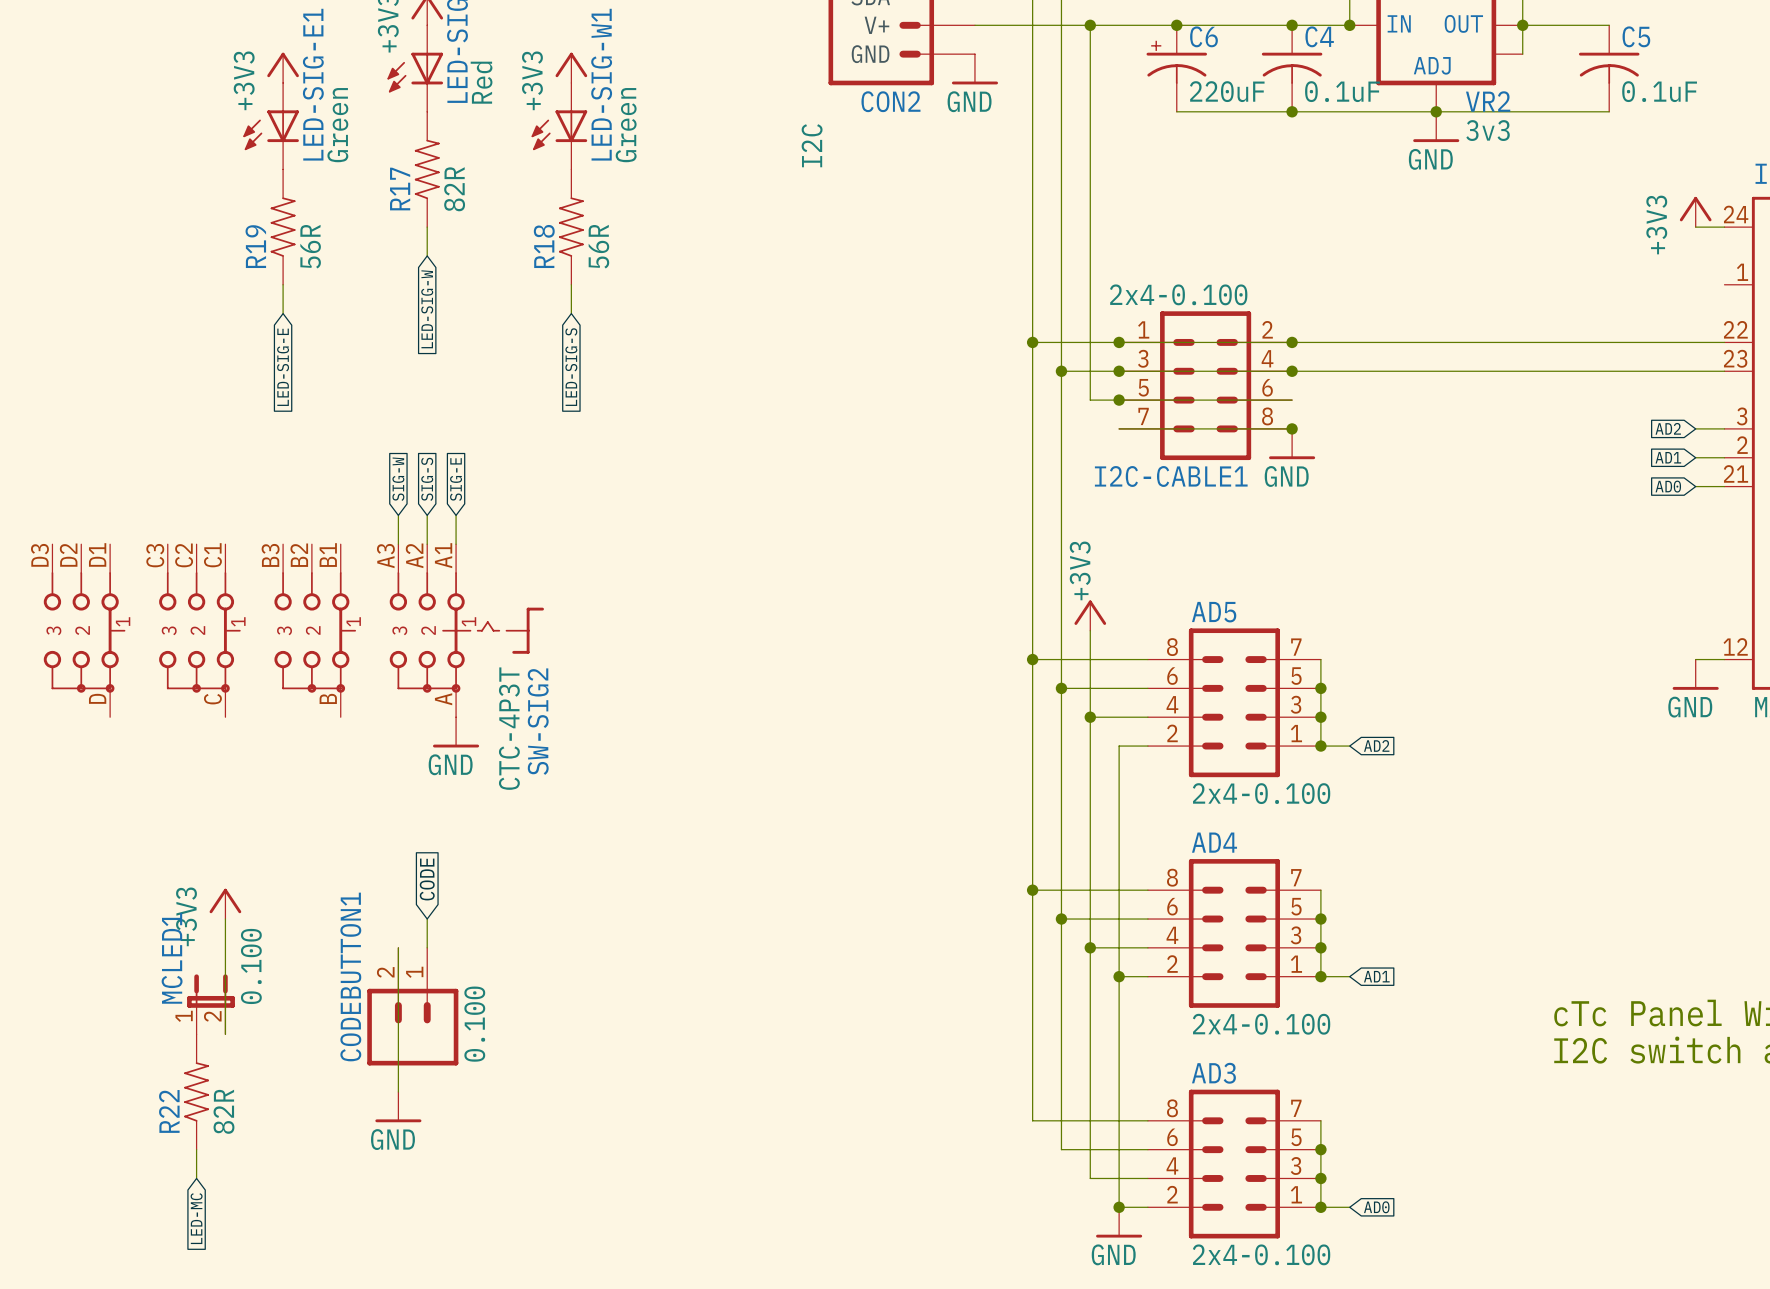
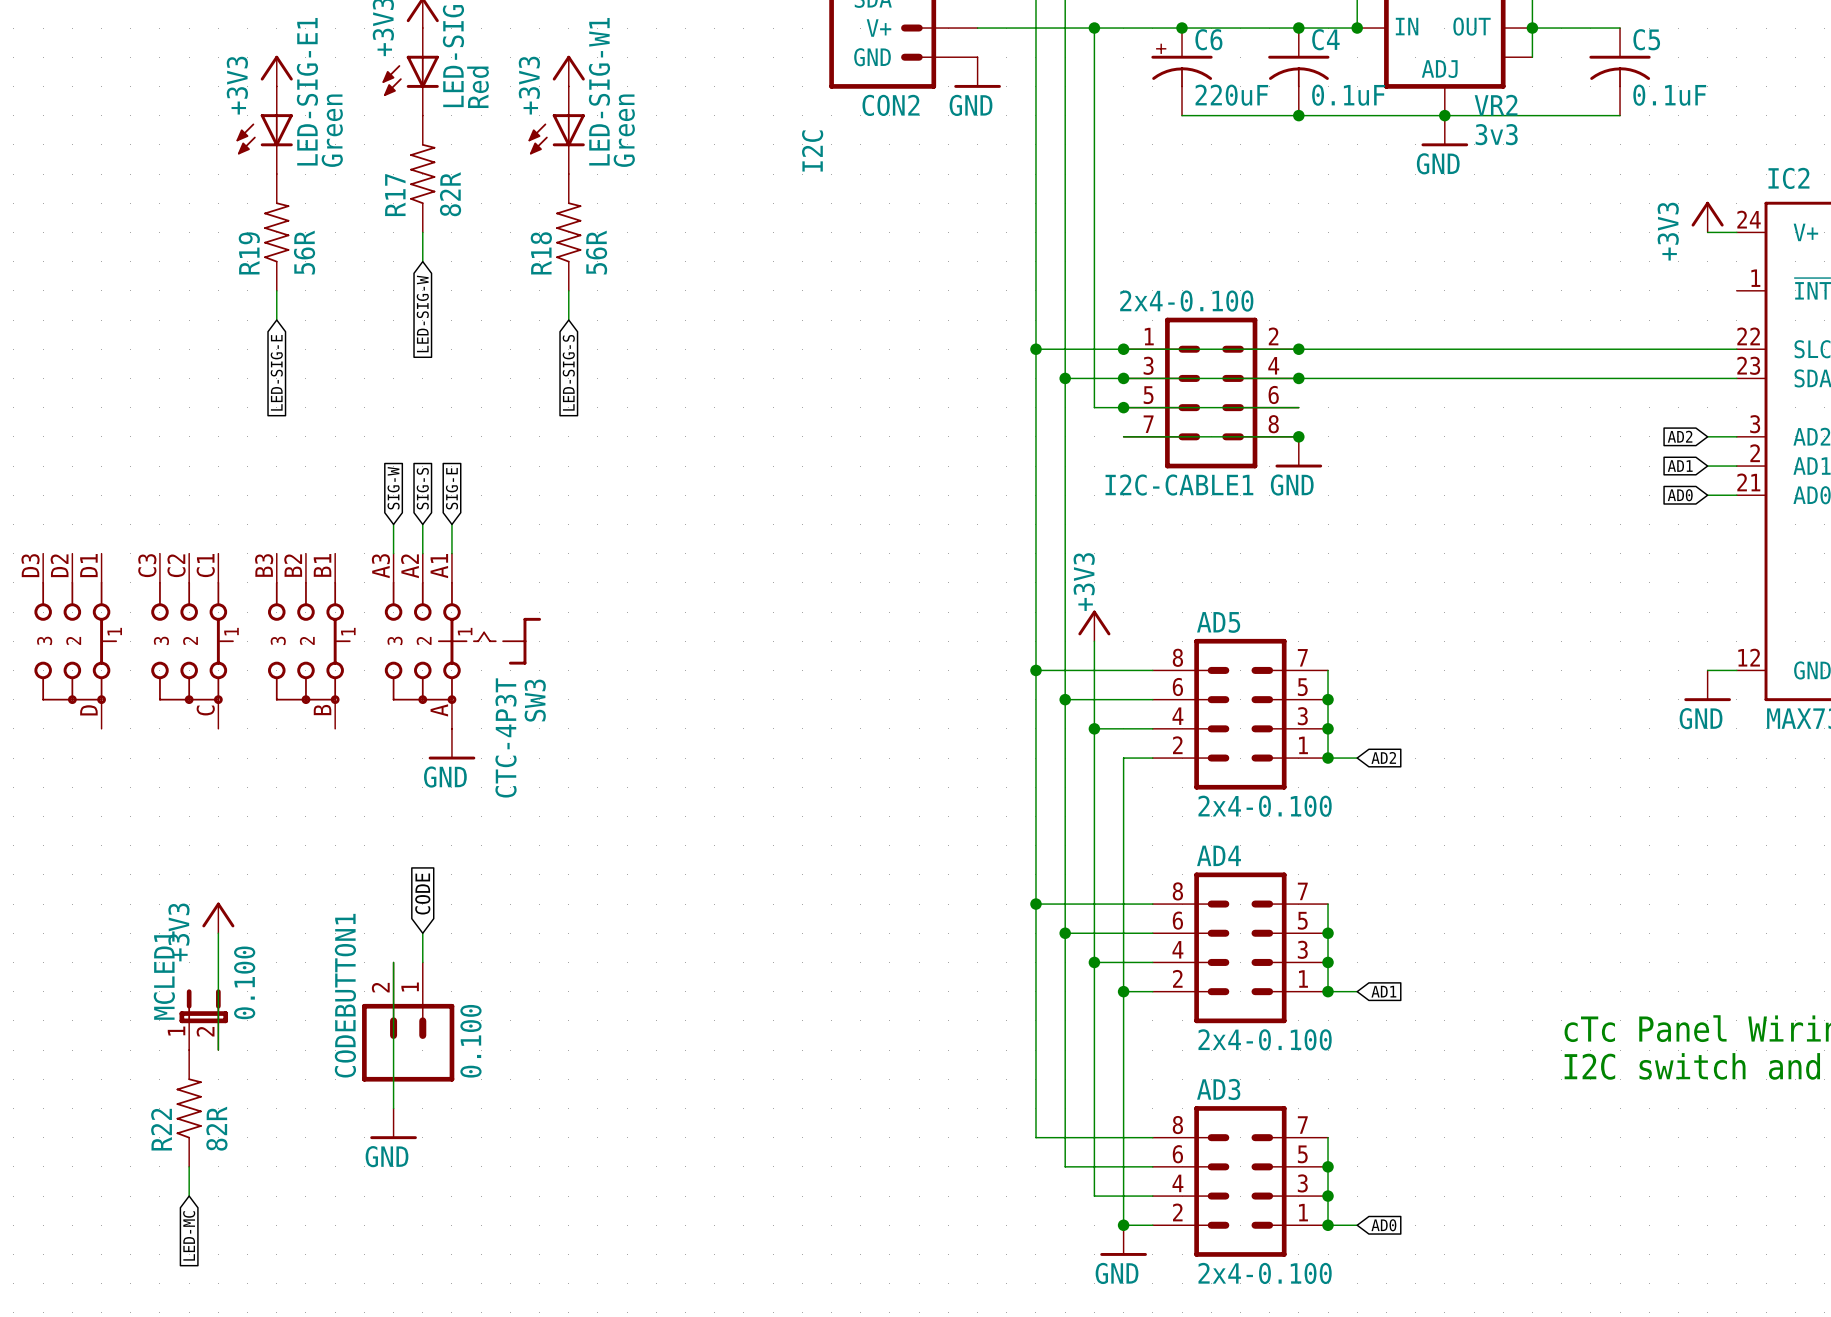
SW-SIG2 name: SW-SIG2 (538, 721) -> SW3 (535, 700)

